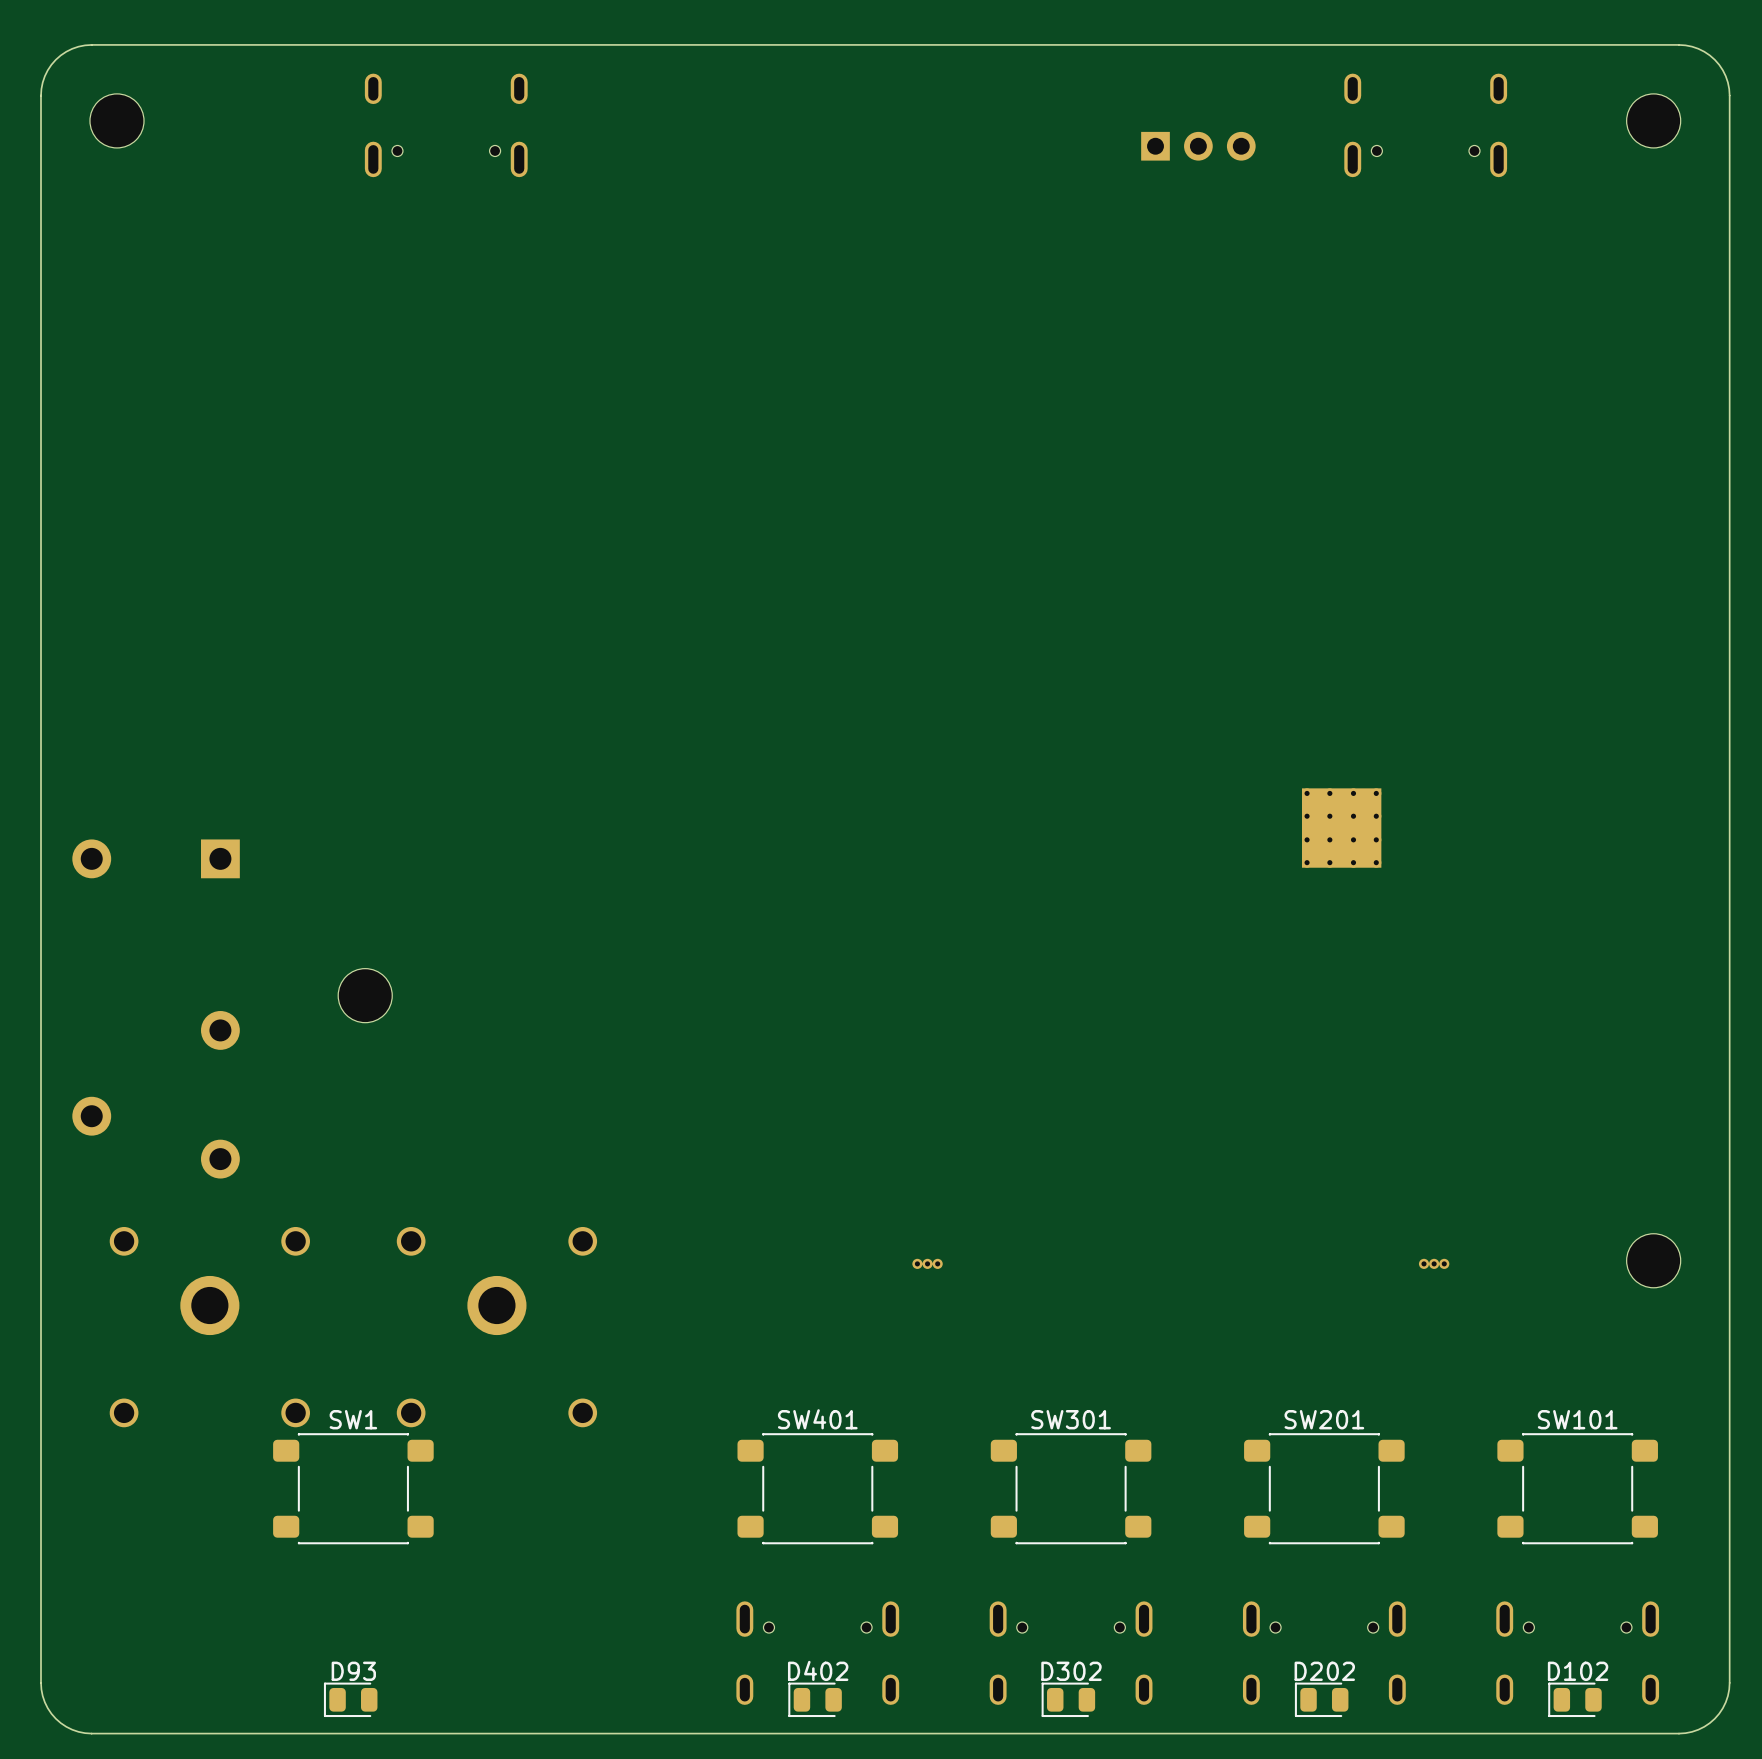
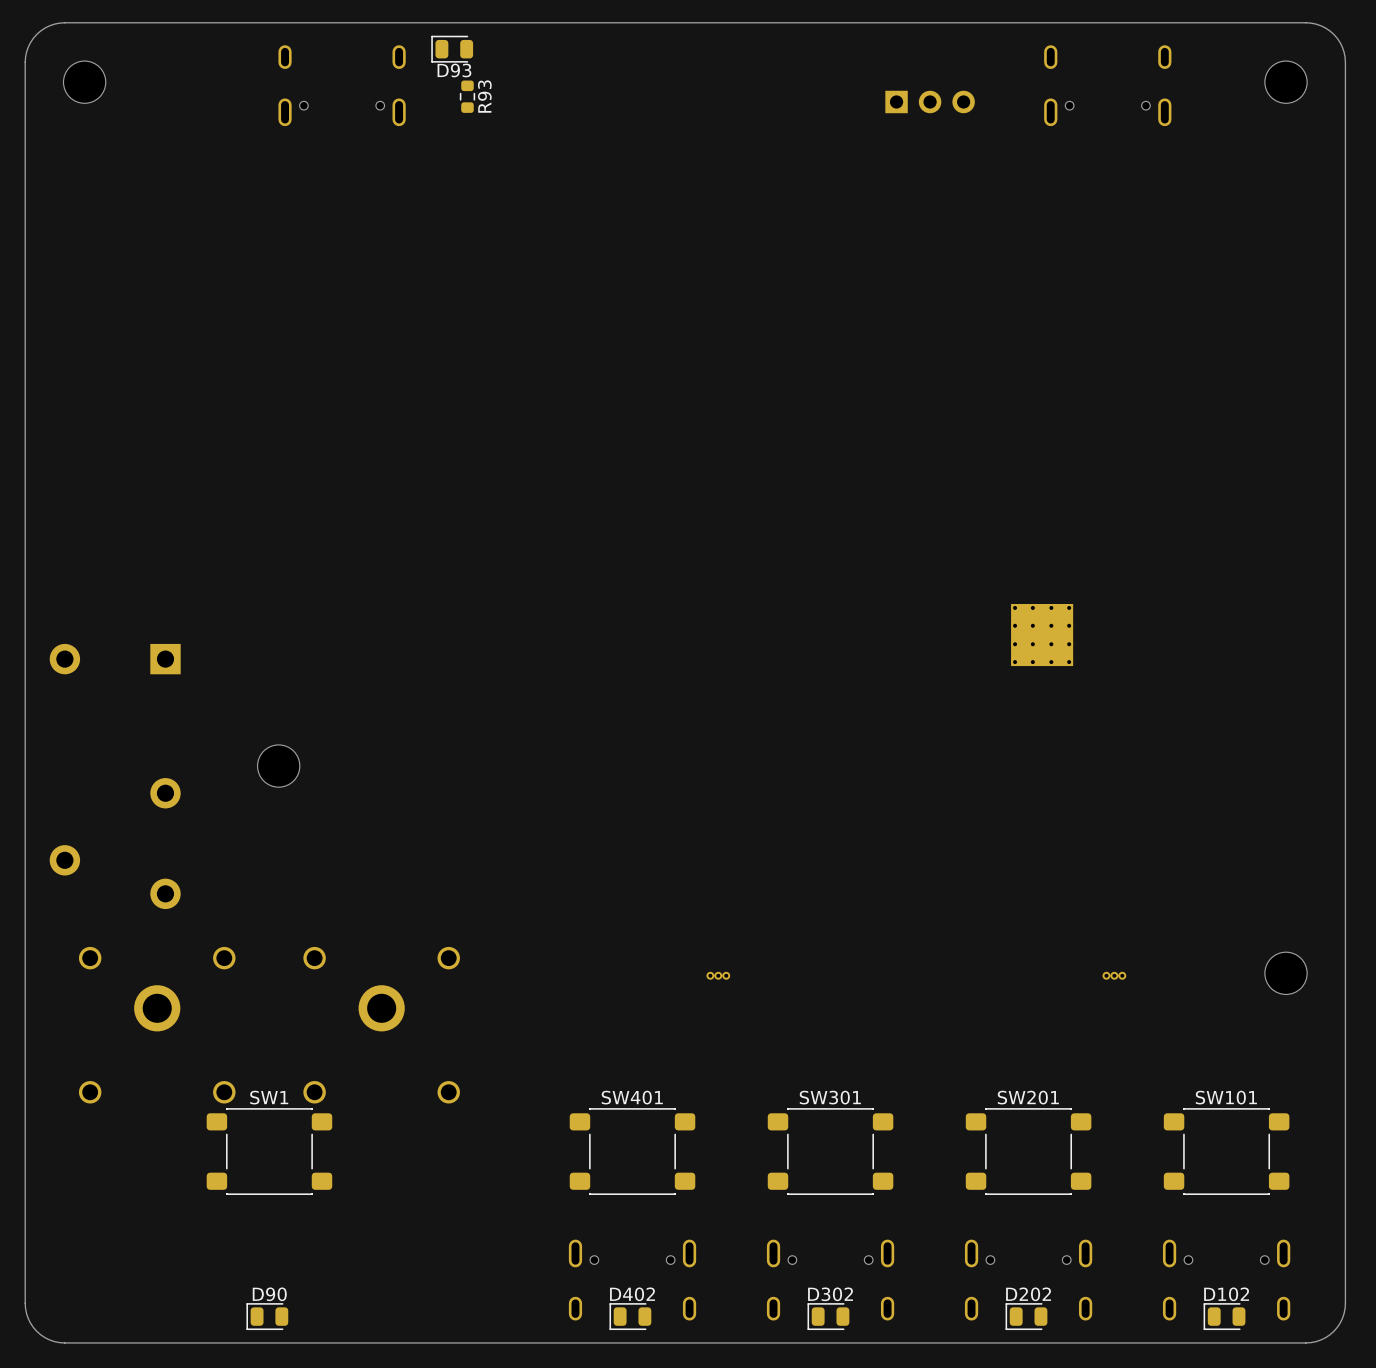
D93: none -> (452, 49)
R93: none -> (467, 96)
D93 name: D93 (353, 1671) -> D90 (269, 1294)

